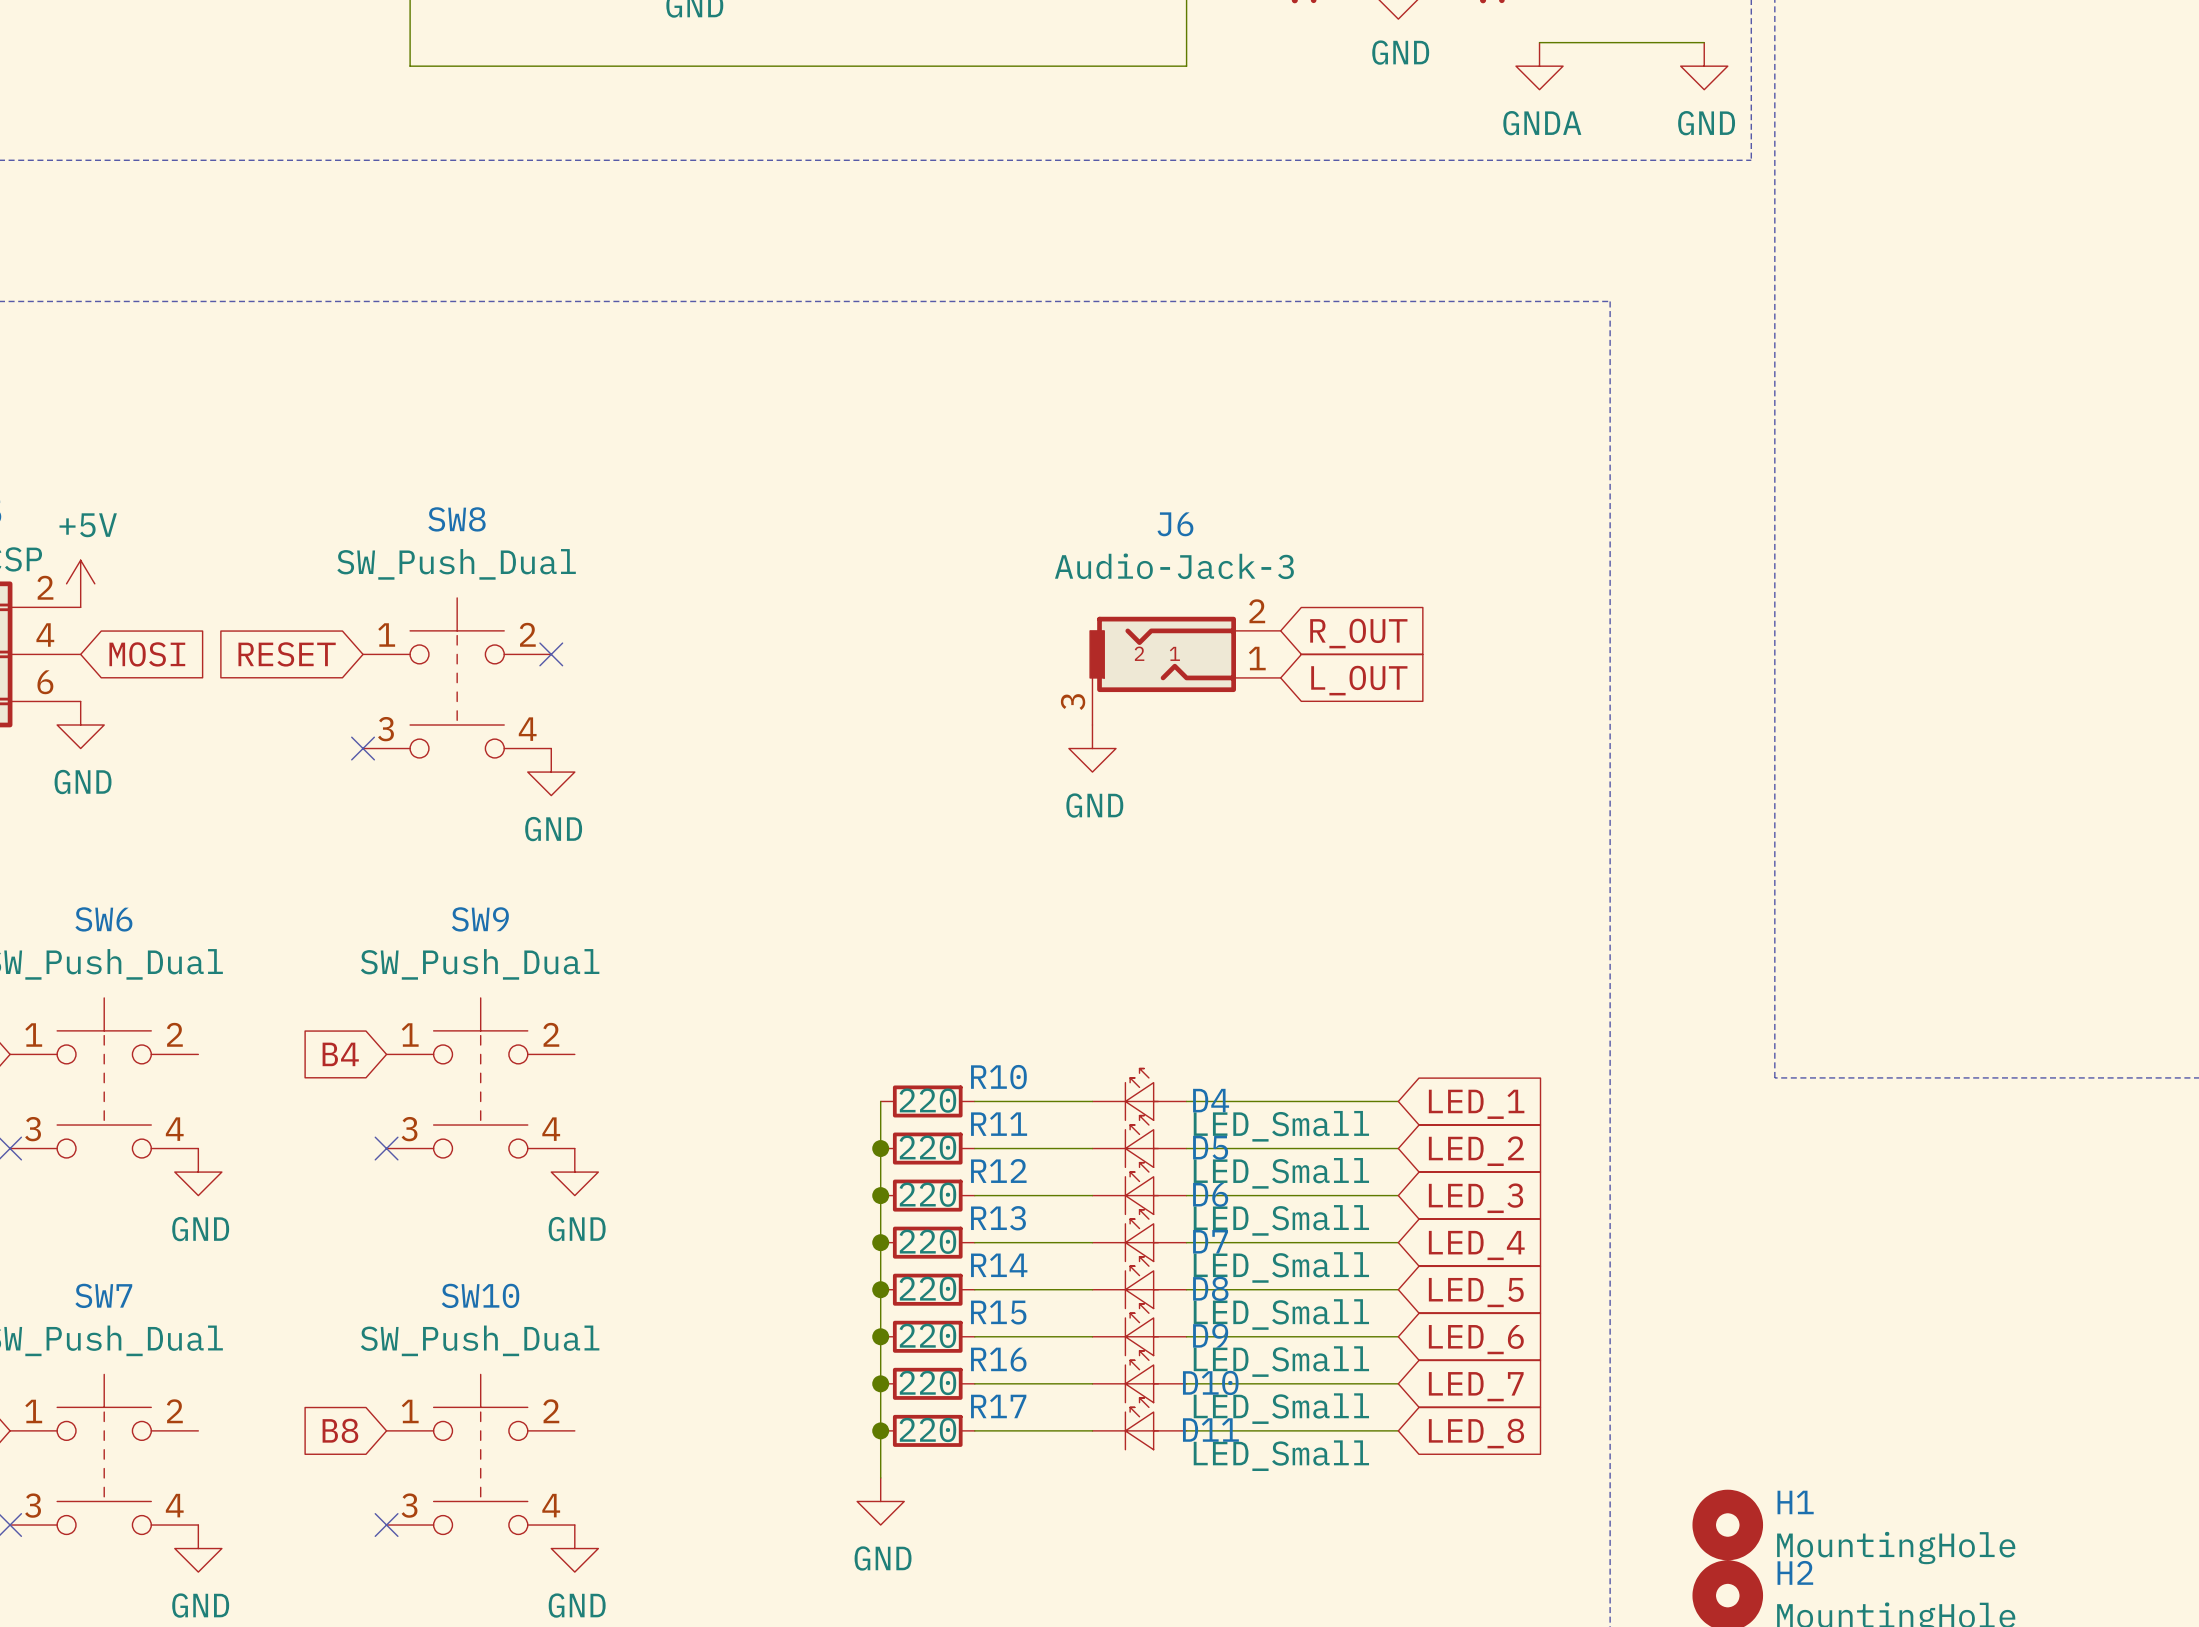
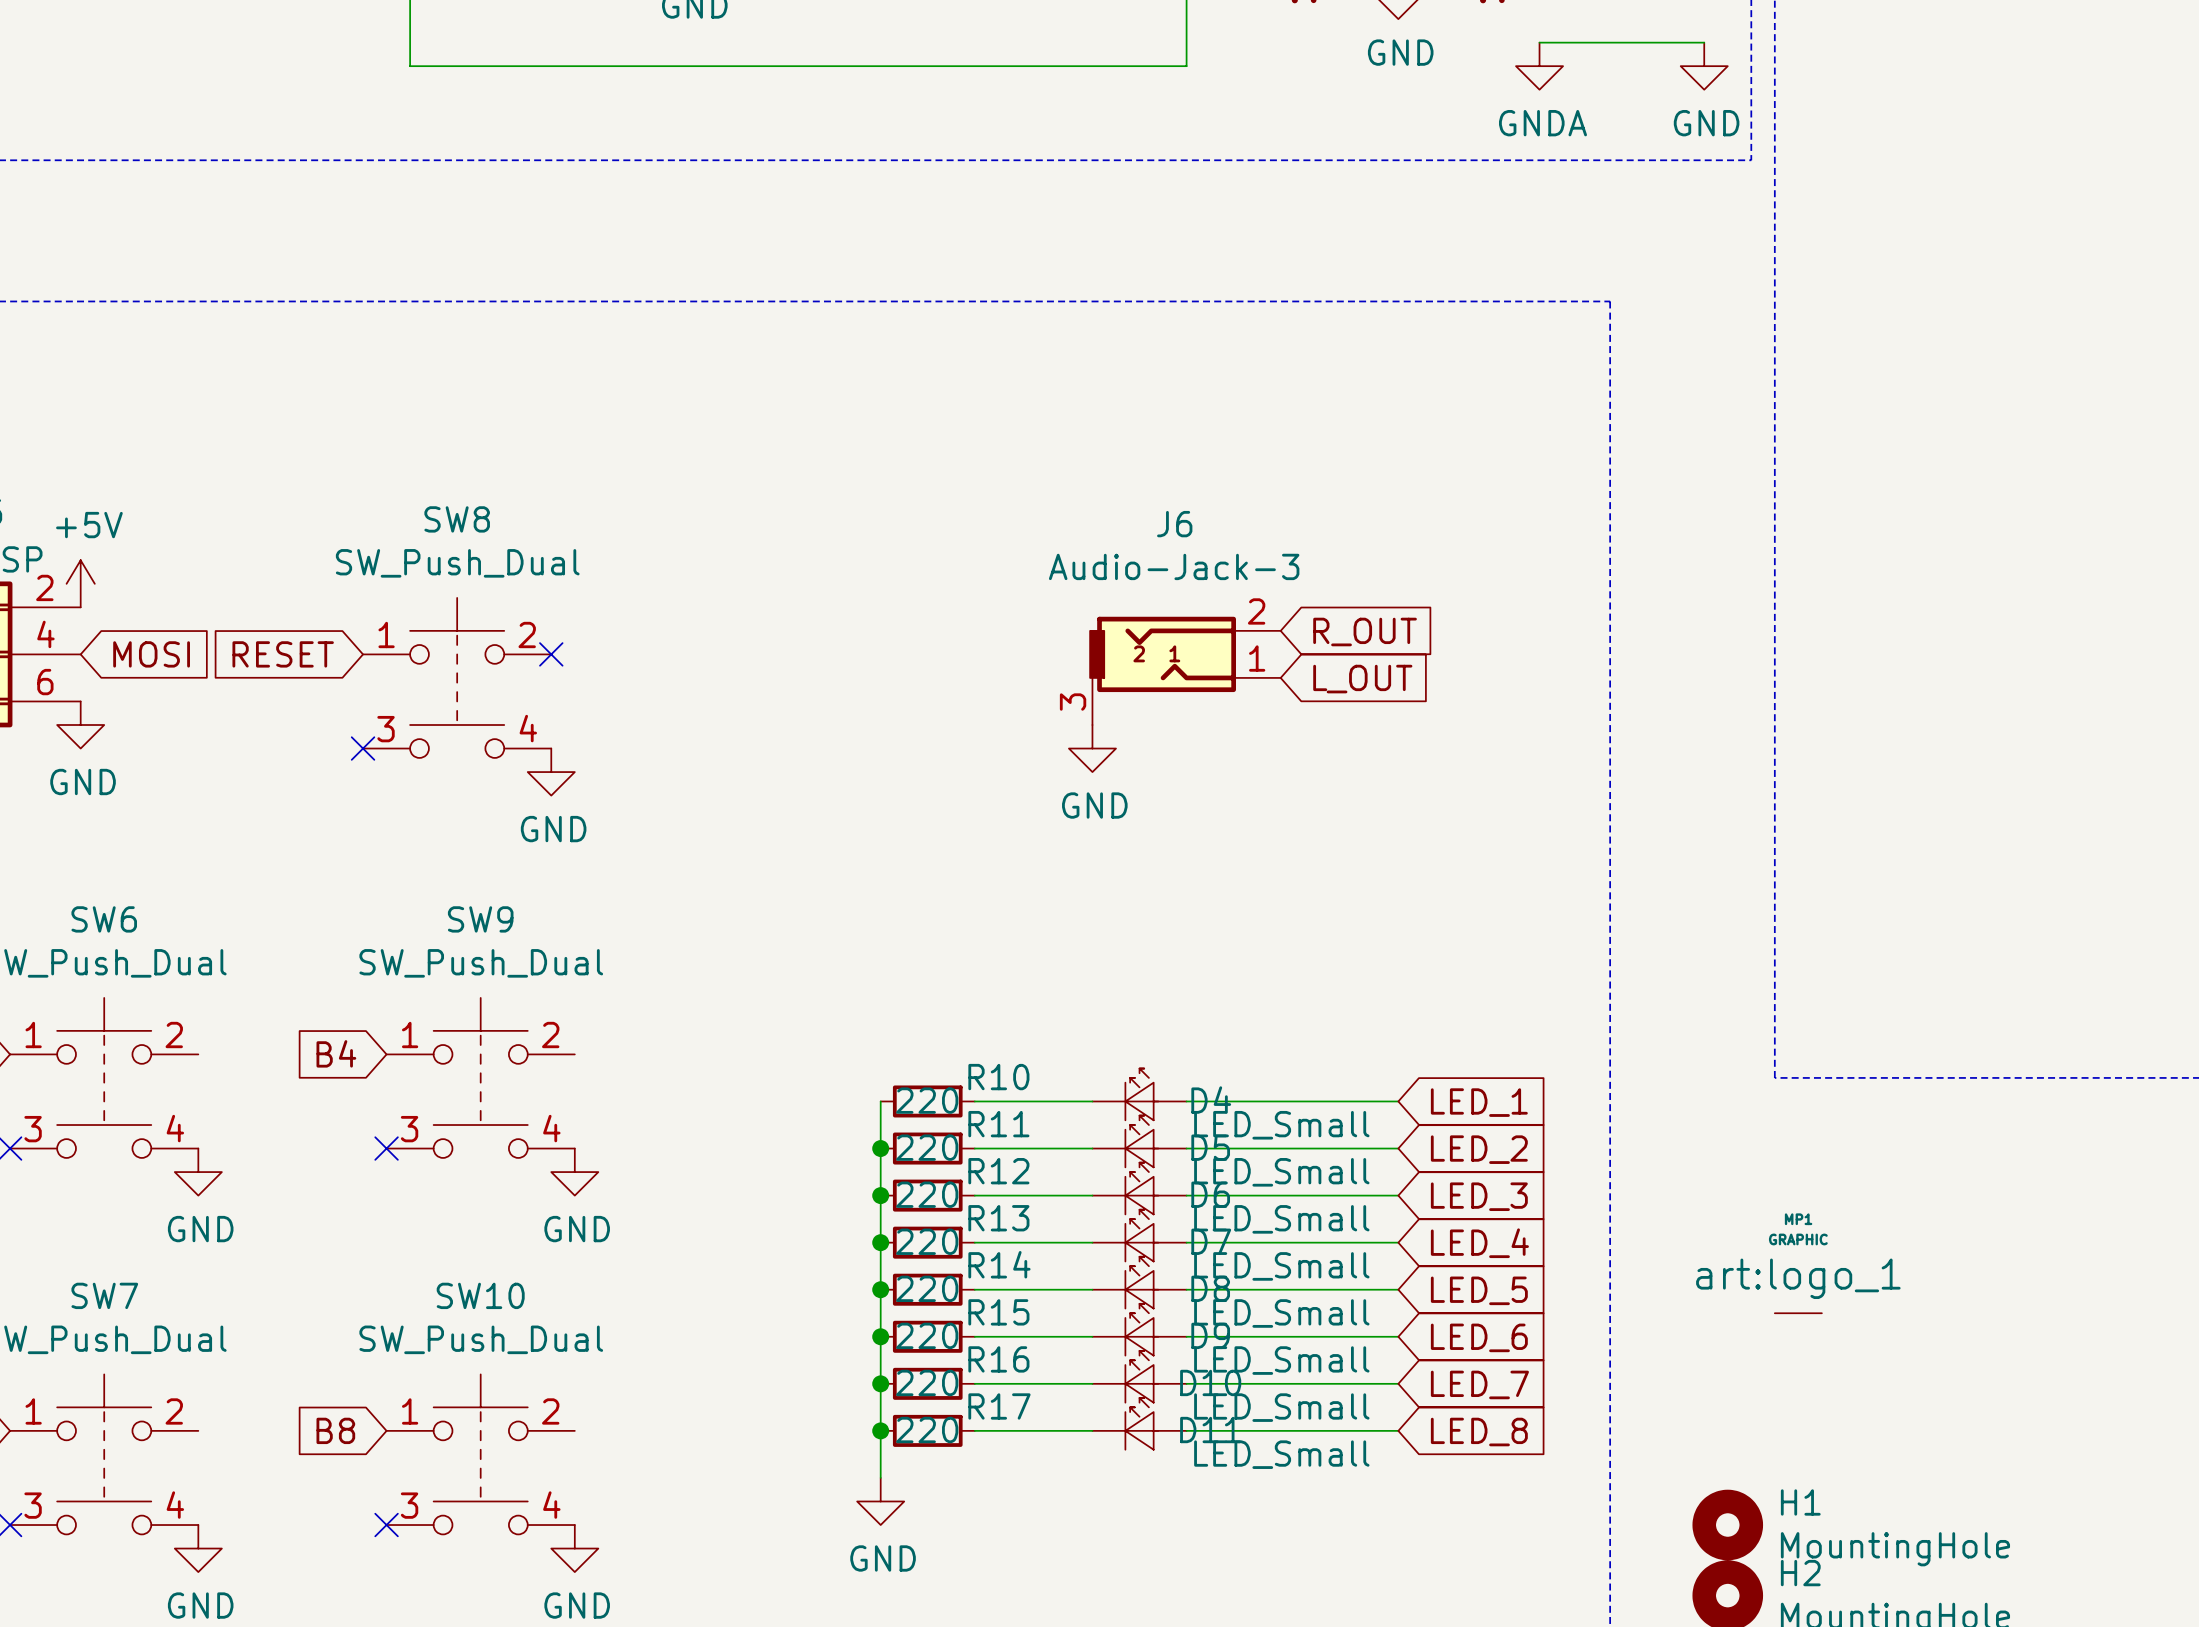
MP1: none -> GRAPHIC (1798, 1313)

